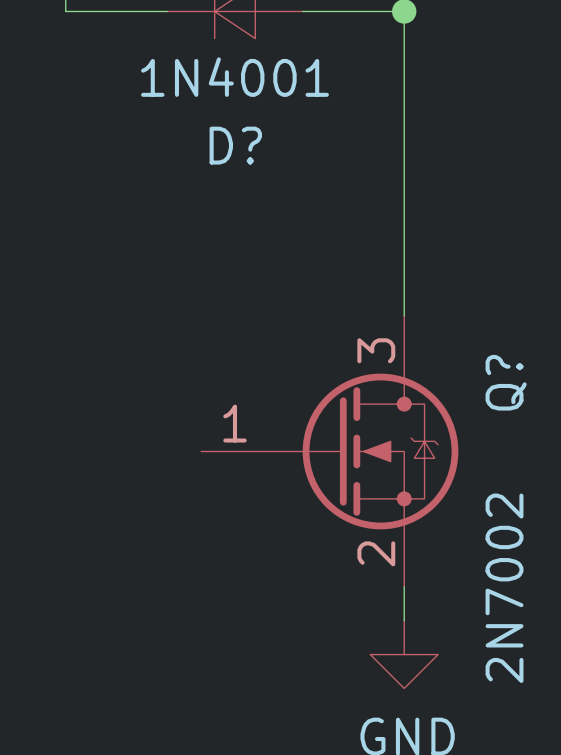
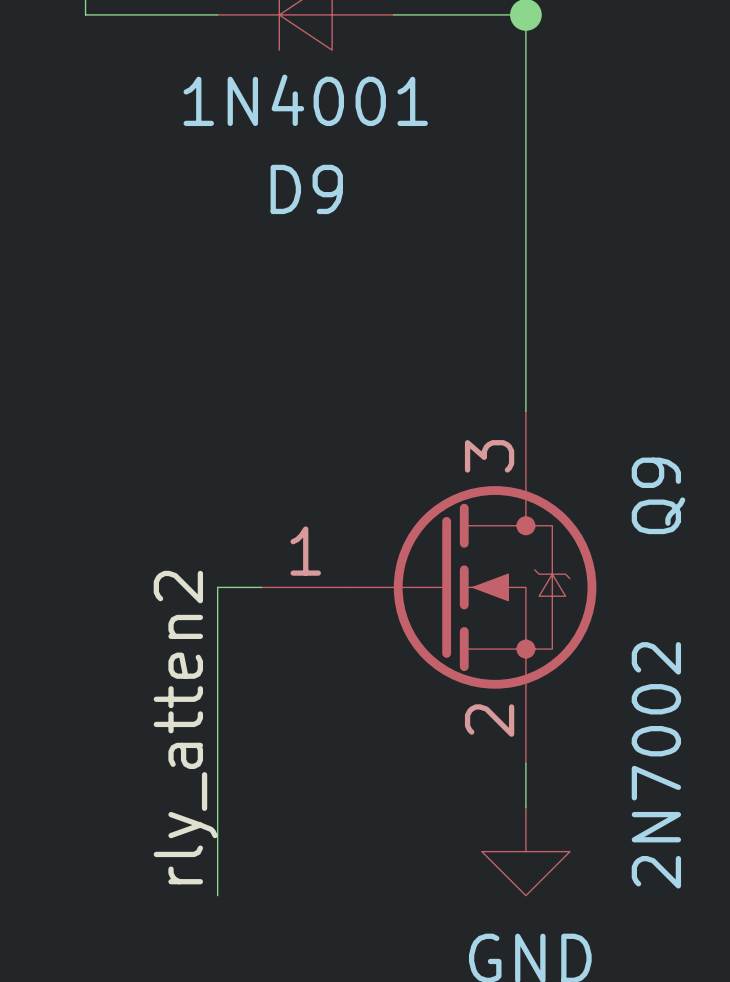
D? name: D? (235, 145) -> D9 (306, 189)
Q? name: Q? (506, 382) -> Q9 (658, 495)
wire: none -> (261, 587) (217, 587) (217, 895)
label: none -> rly_atten2 (185, 727)

